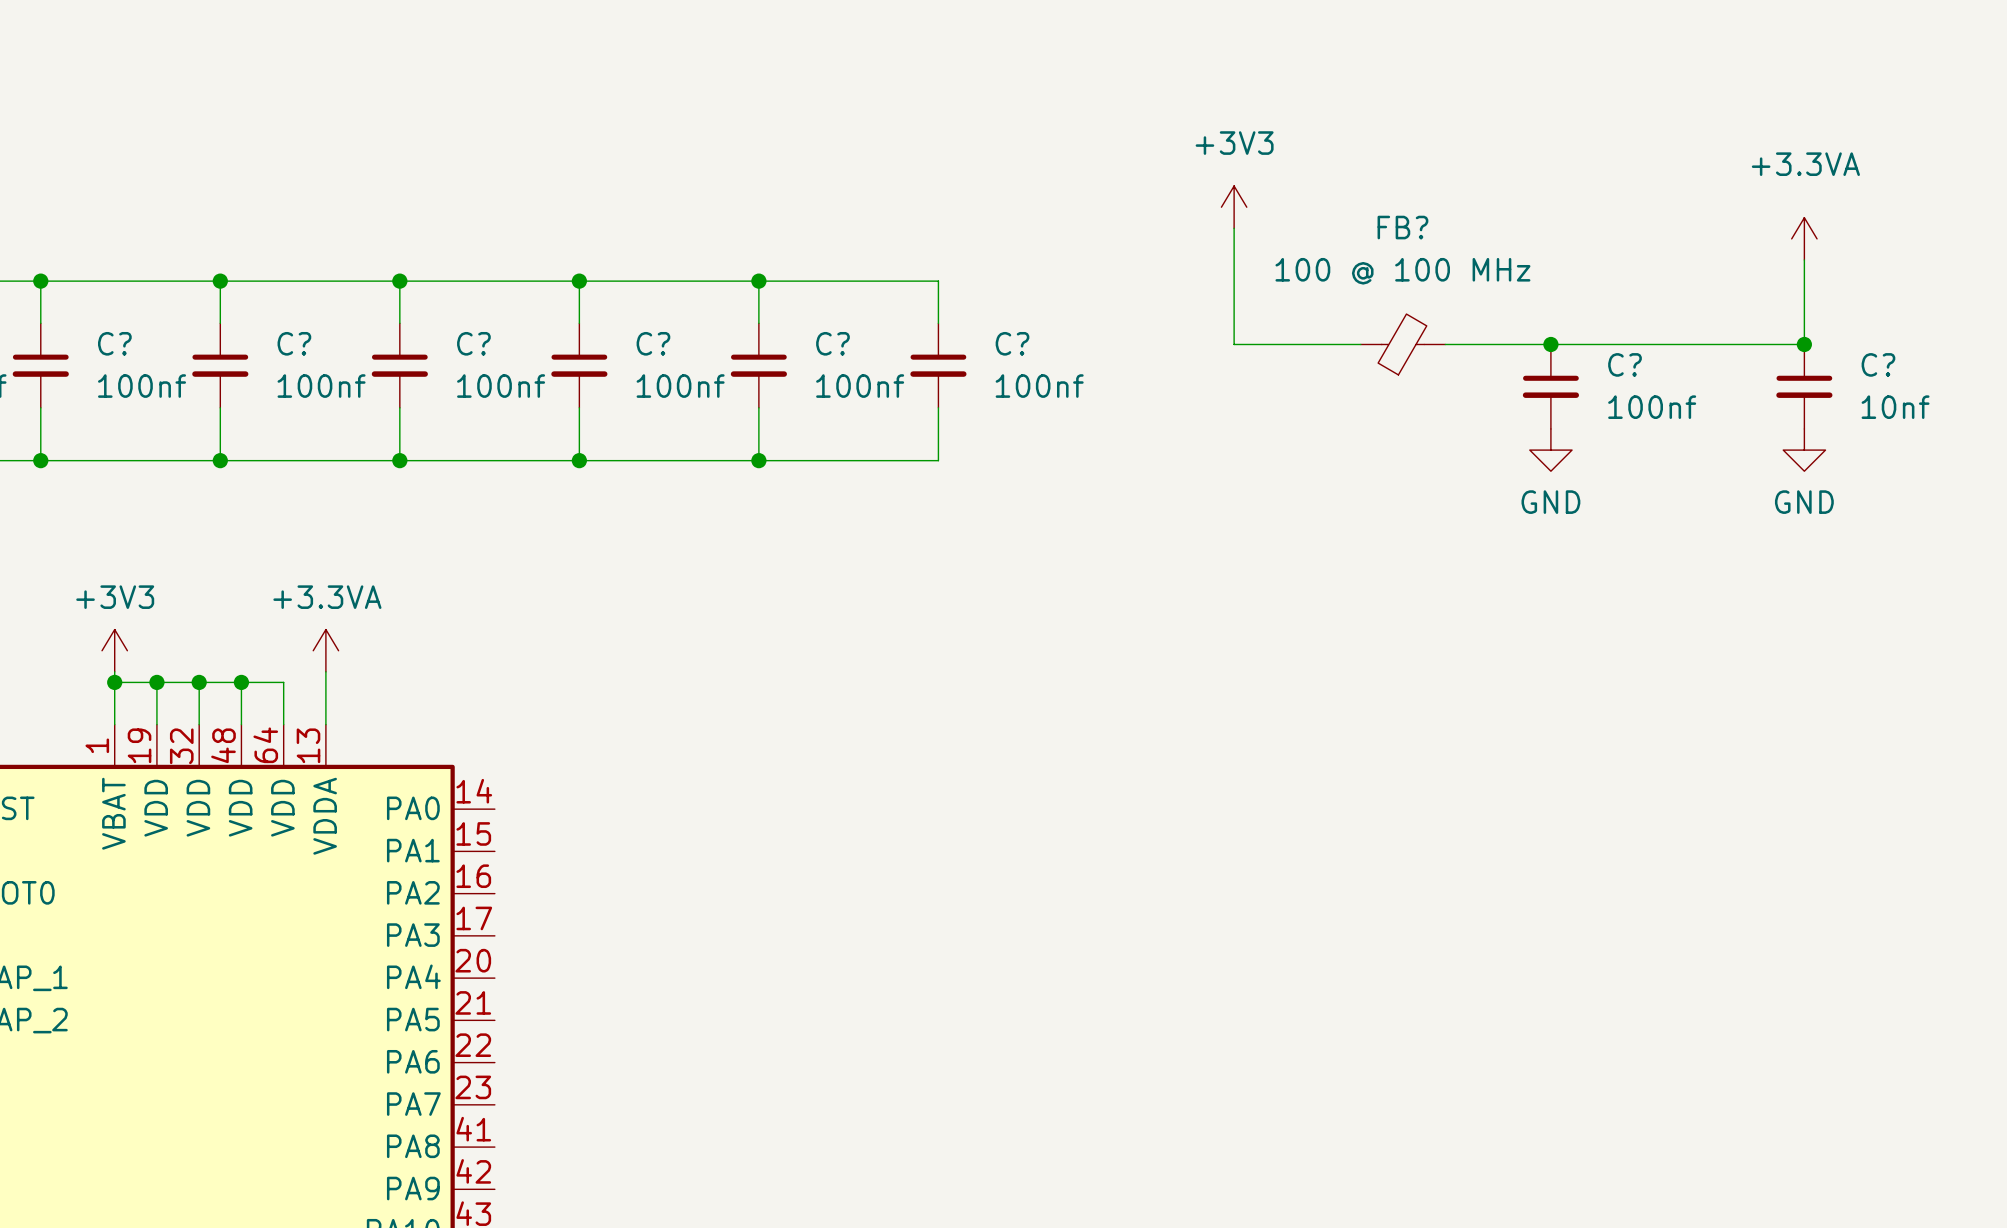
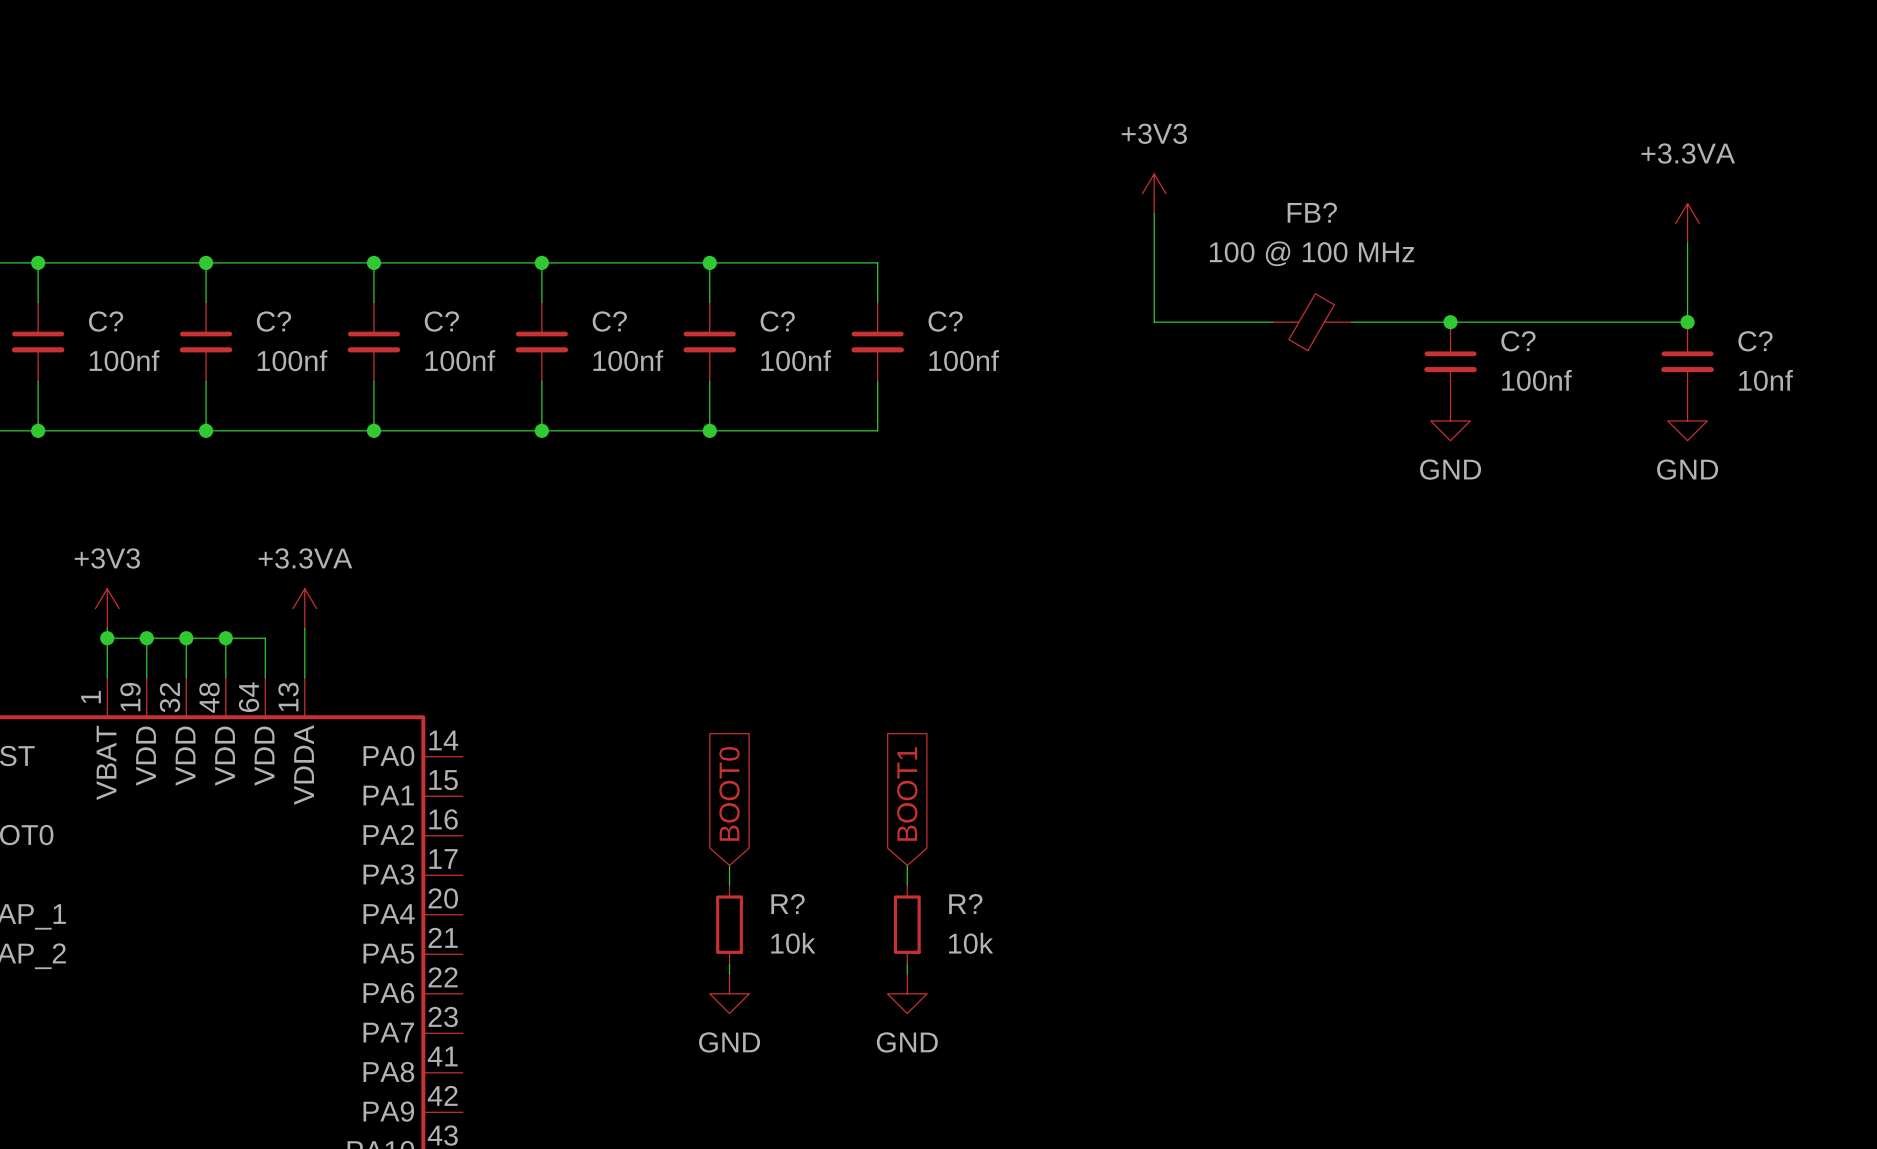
global label: none -> BOOT0 (729, 793)
global label: none -> BOOT1 (907, 794)
wire: none -> (729, 865) (729, 885)
wire: none -> (907, 865) (907, 885)
R?: none -> 10k (729, 924)
R?: none -> 10k (907, 924)
wire: none -> (729, 964) (729, 974)
wire: none -> (907, 964) (907, 974)
power symbol: none -> GND (729, 993)
power symbol: none -> GND (907, 993)

